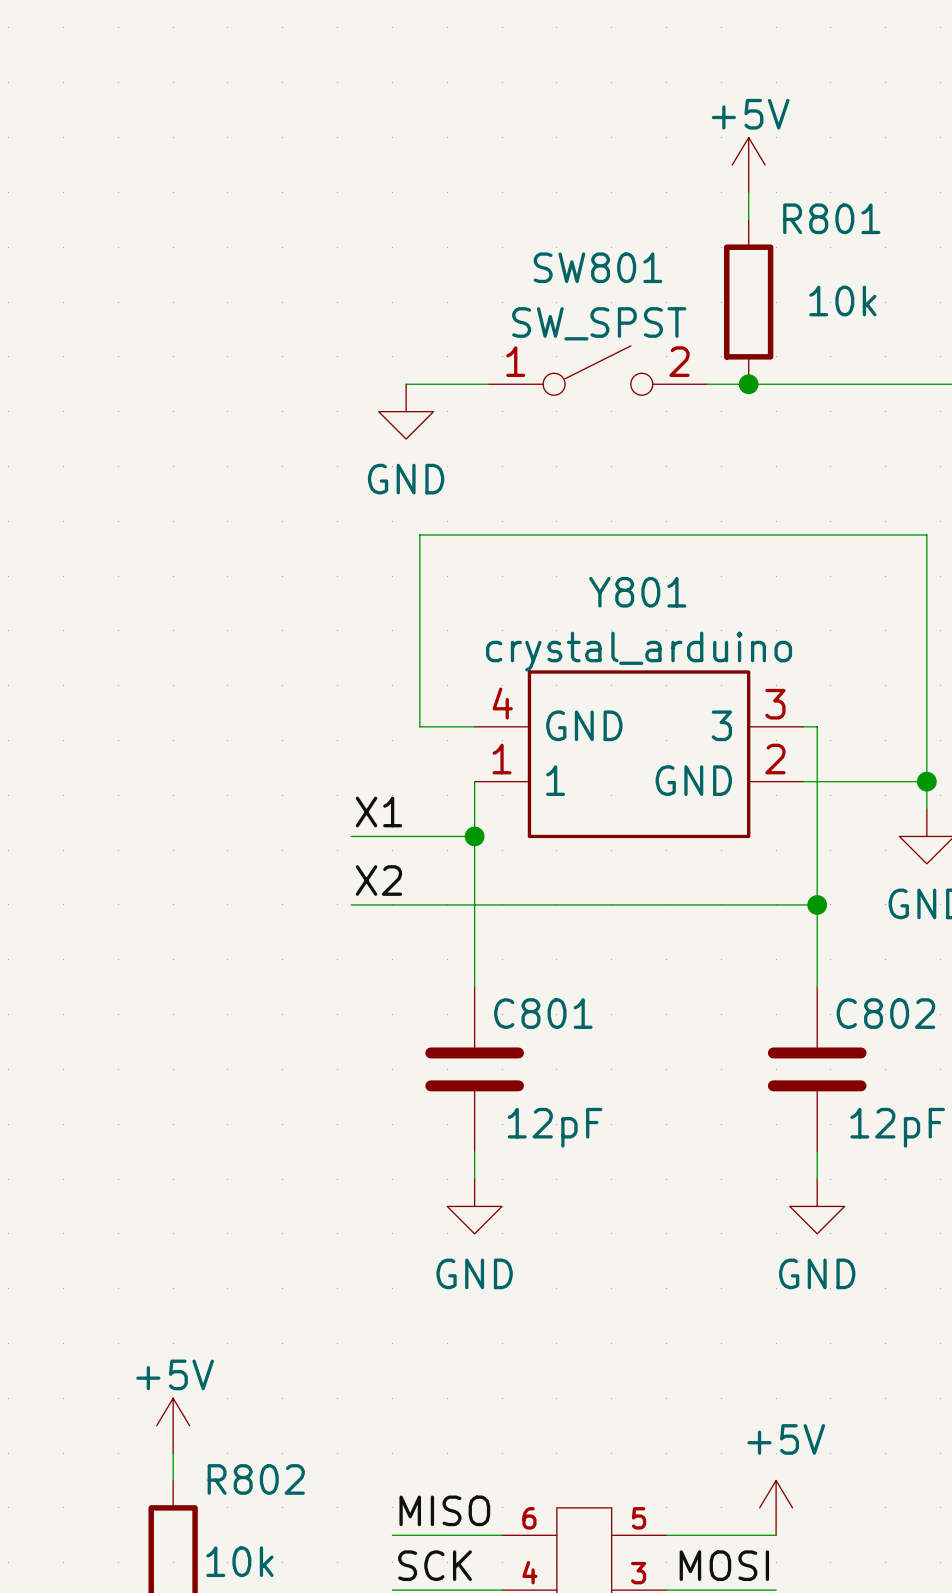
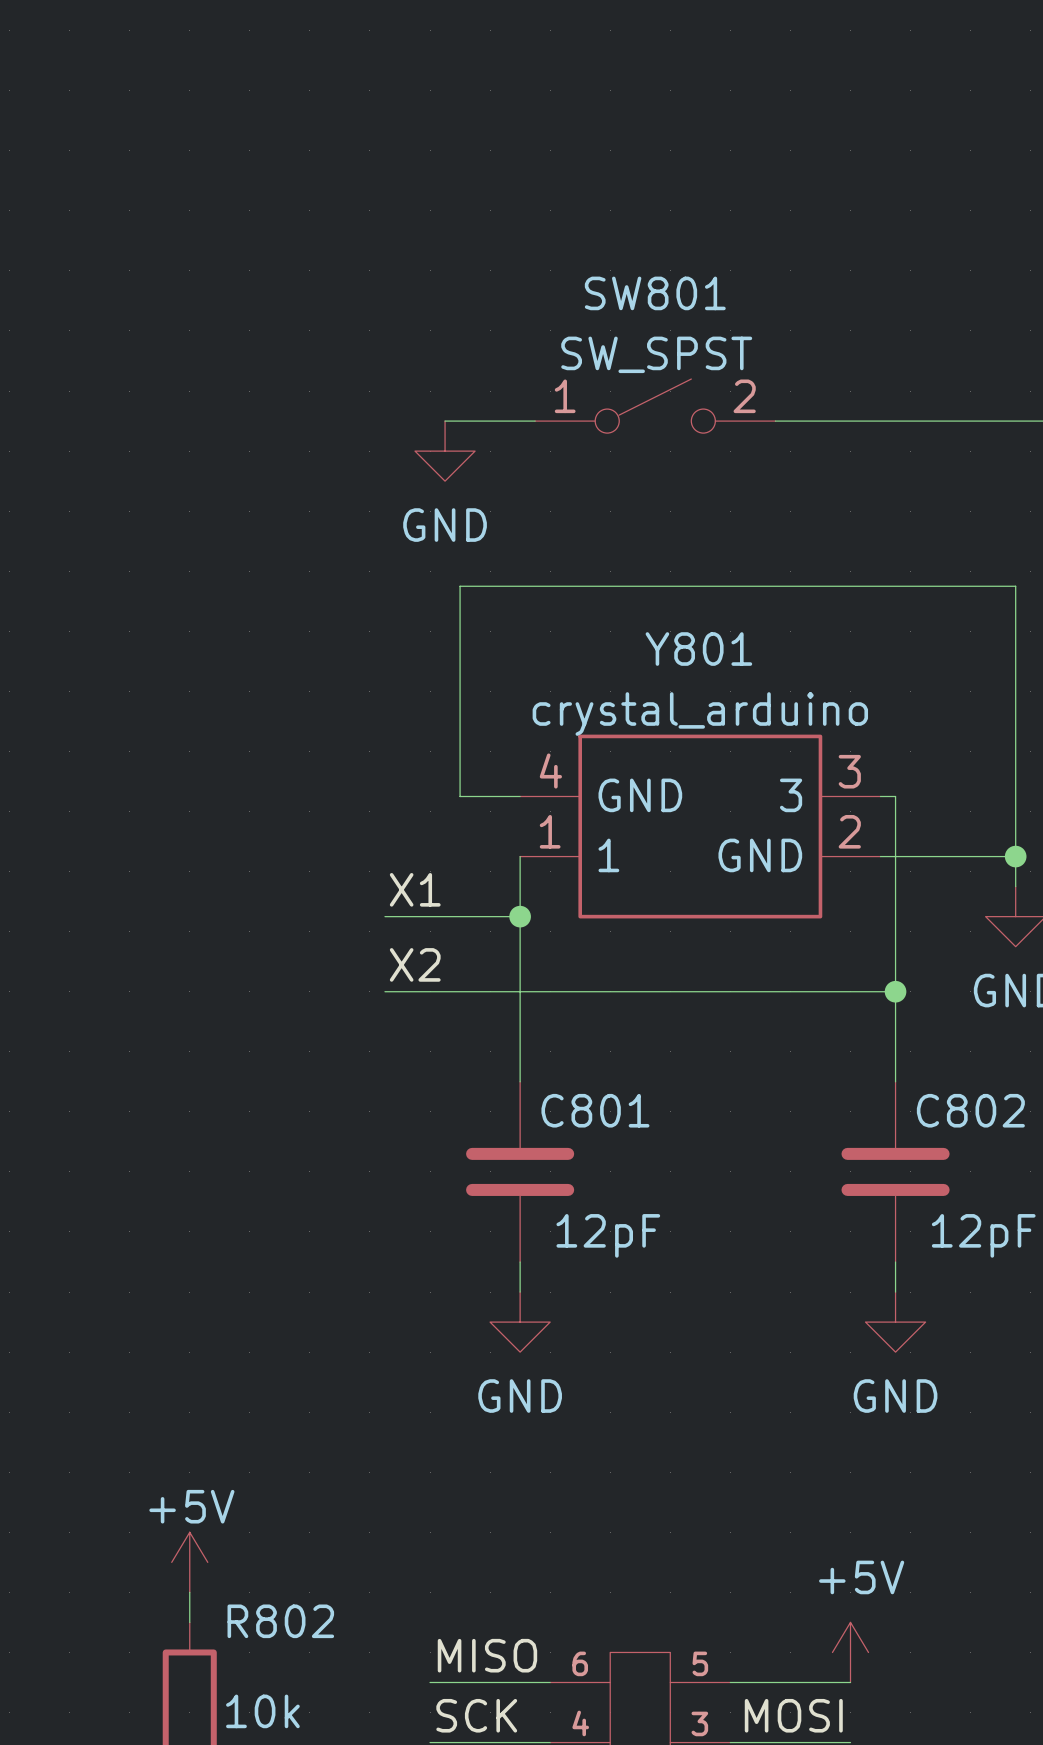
power symbol: +5V (748, 164) -> none
wire: (748, 192) (748, 219) -> none
R801: 10k (748, 302) -> none
junction: (748, 384) -> none

